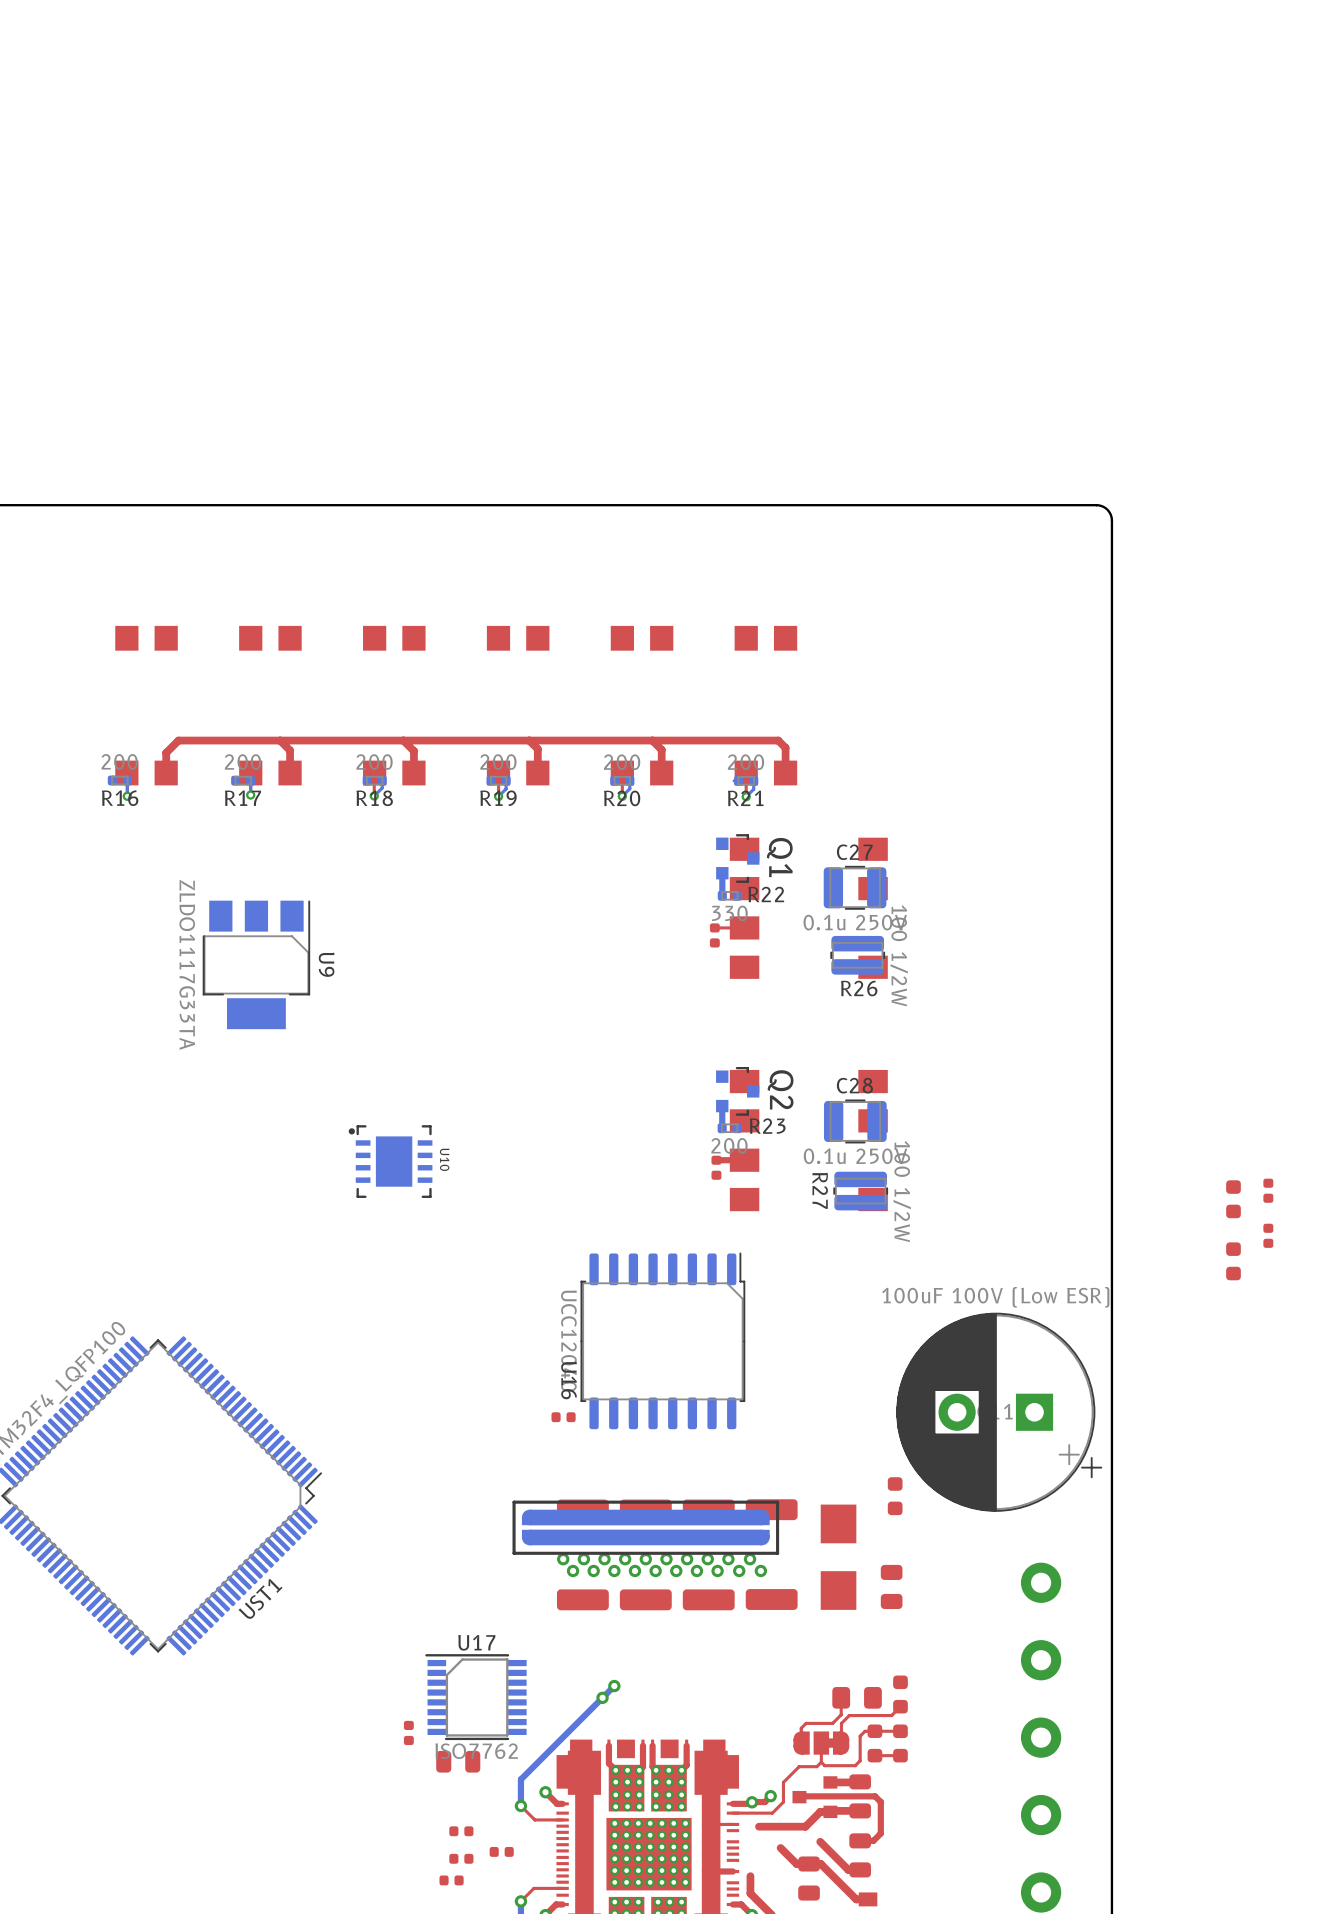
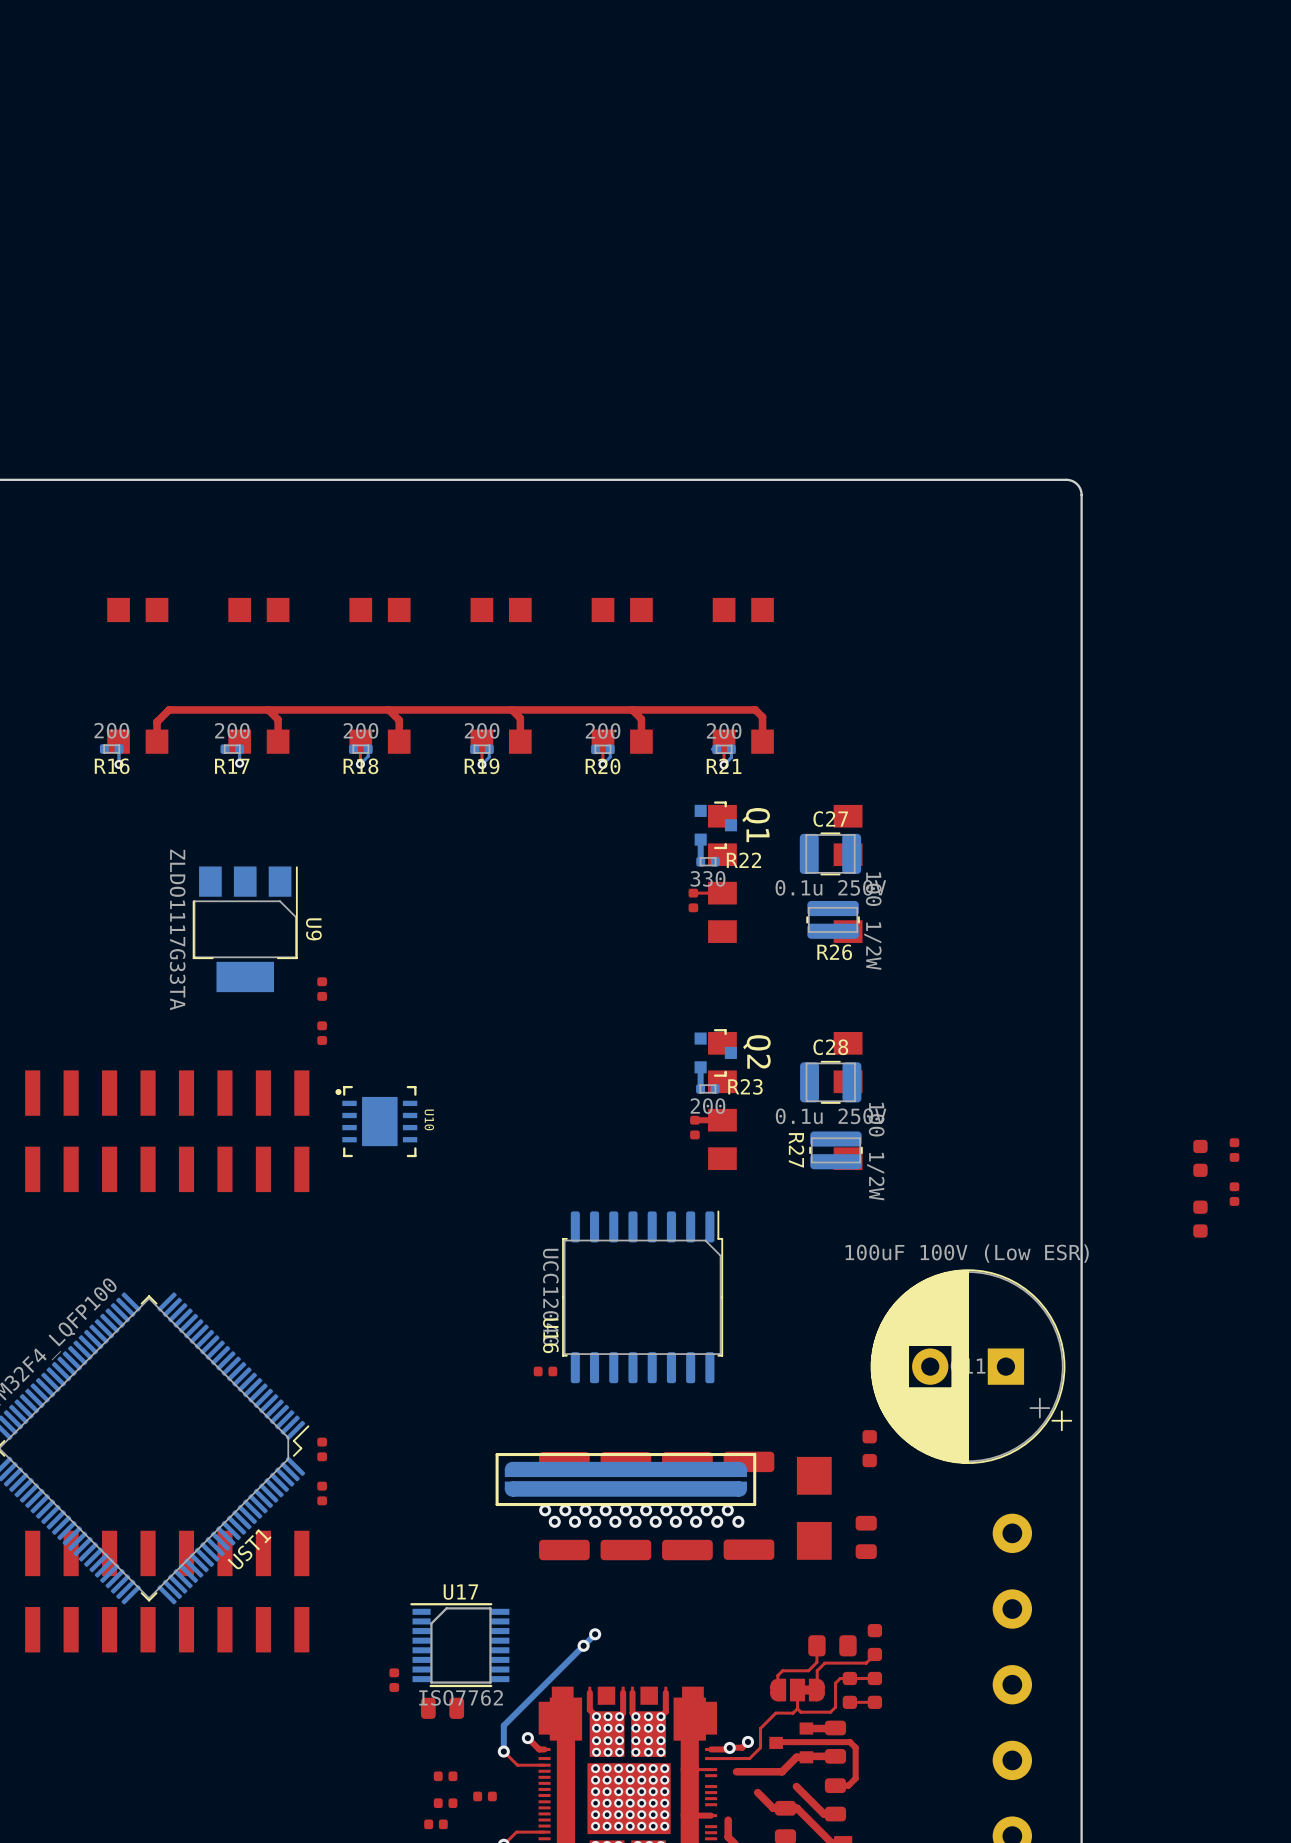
part: none -> (322, 989)
part: none -> (322, 1033)
part: none -> (167, 1131)
part: none -> (322, 1449)
part: none -> (322, 1493)
part: none -> (167, 1591)

